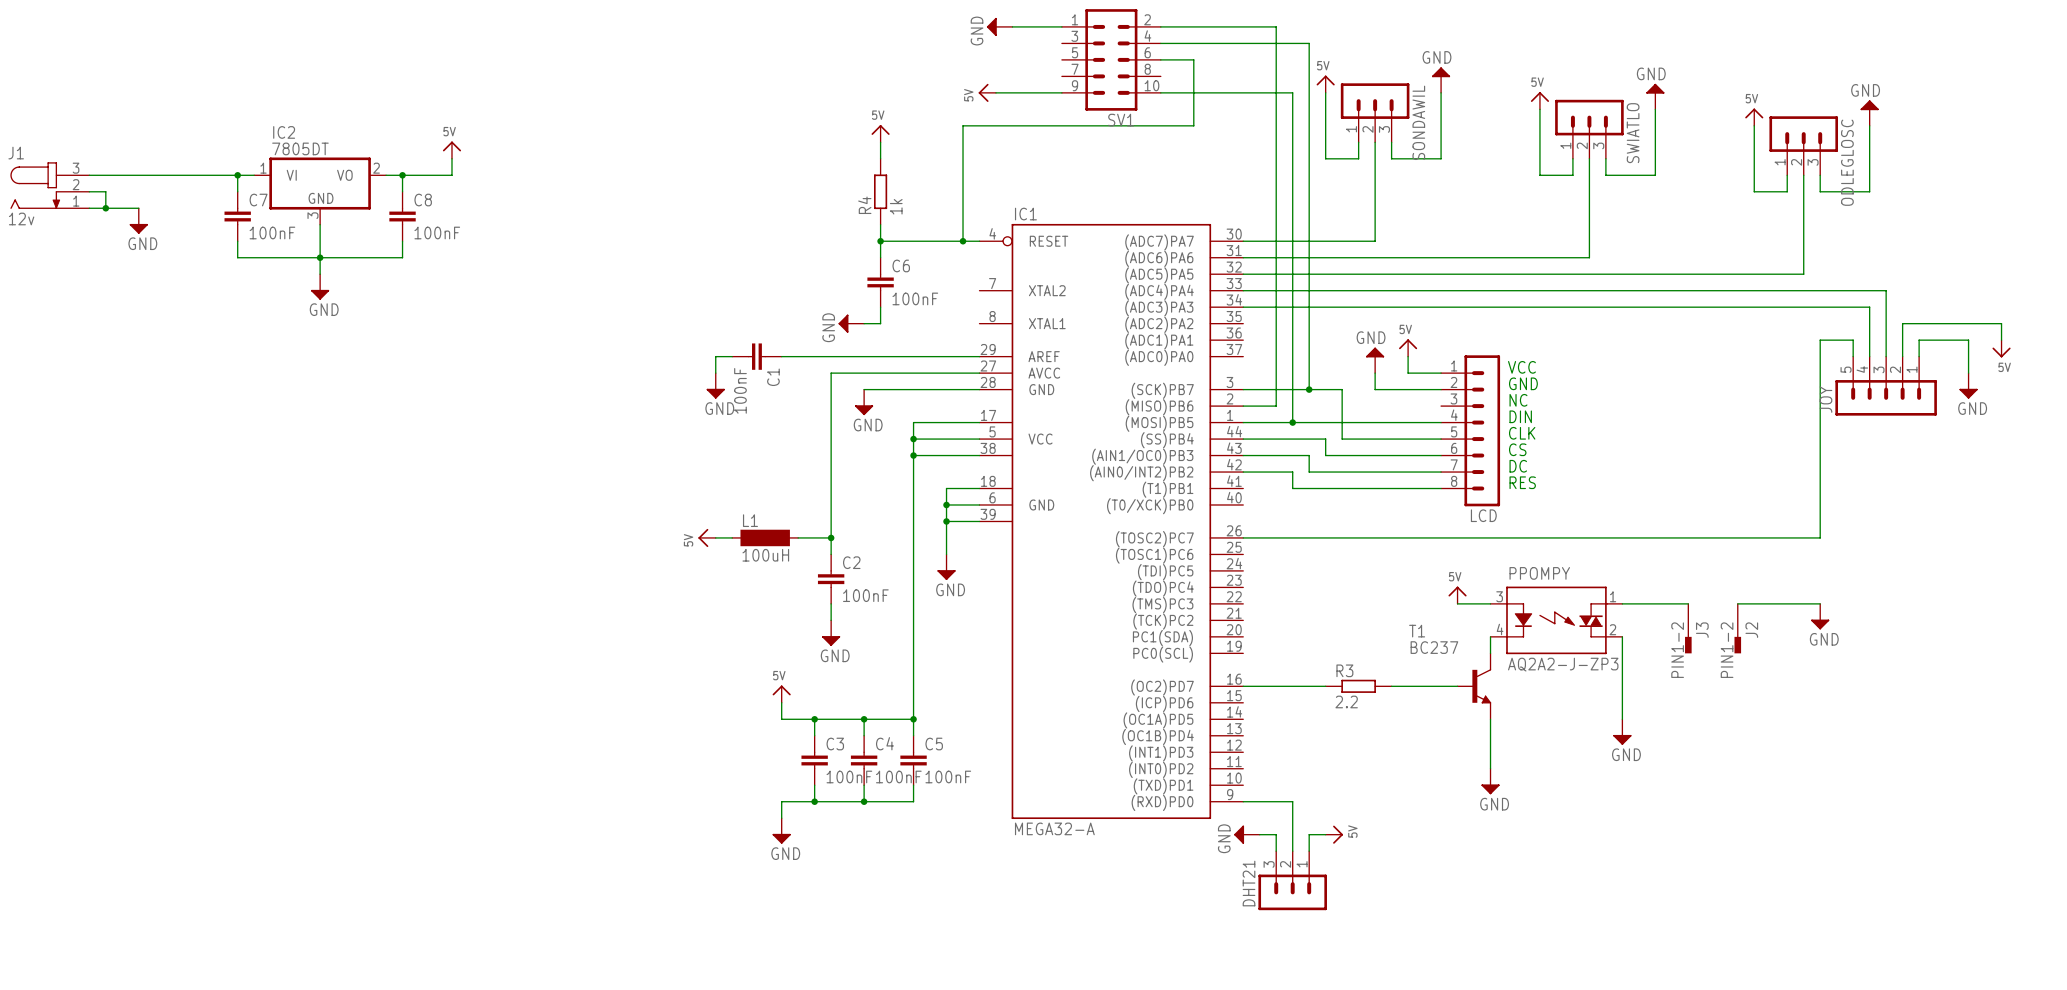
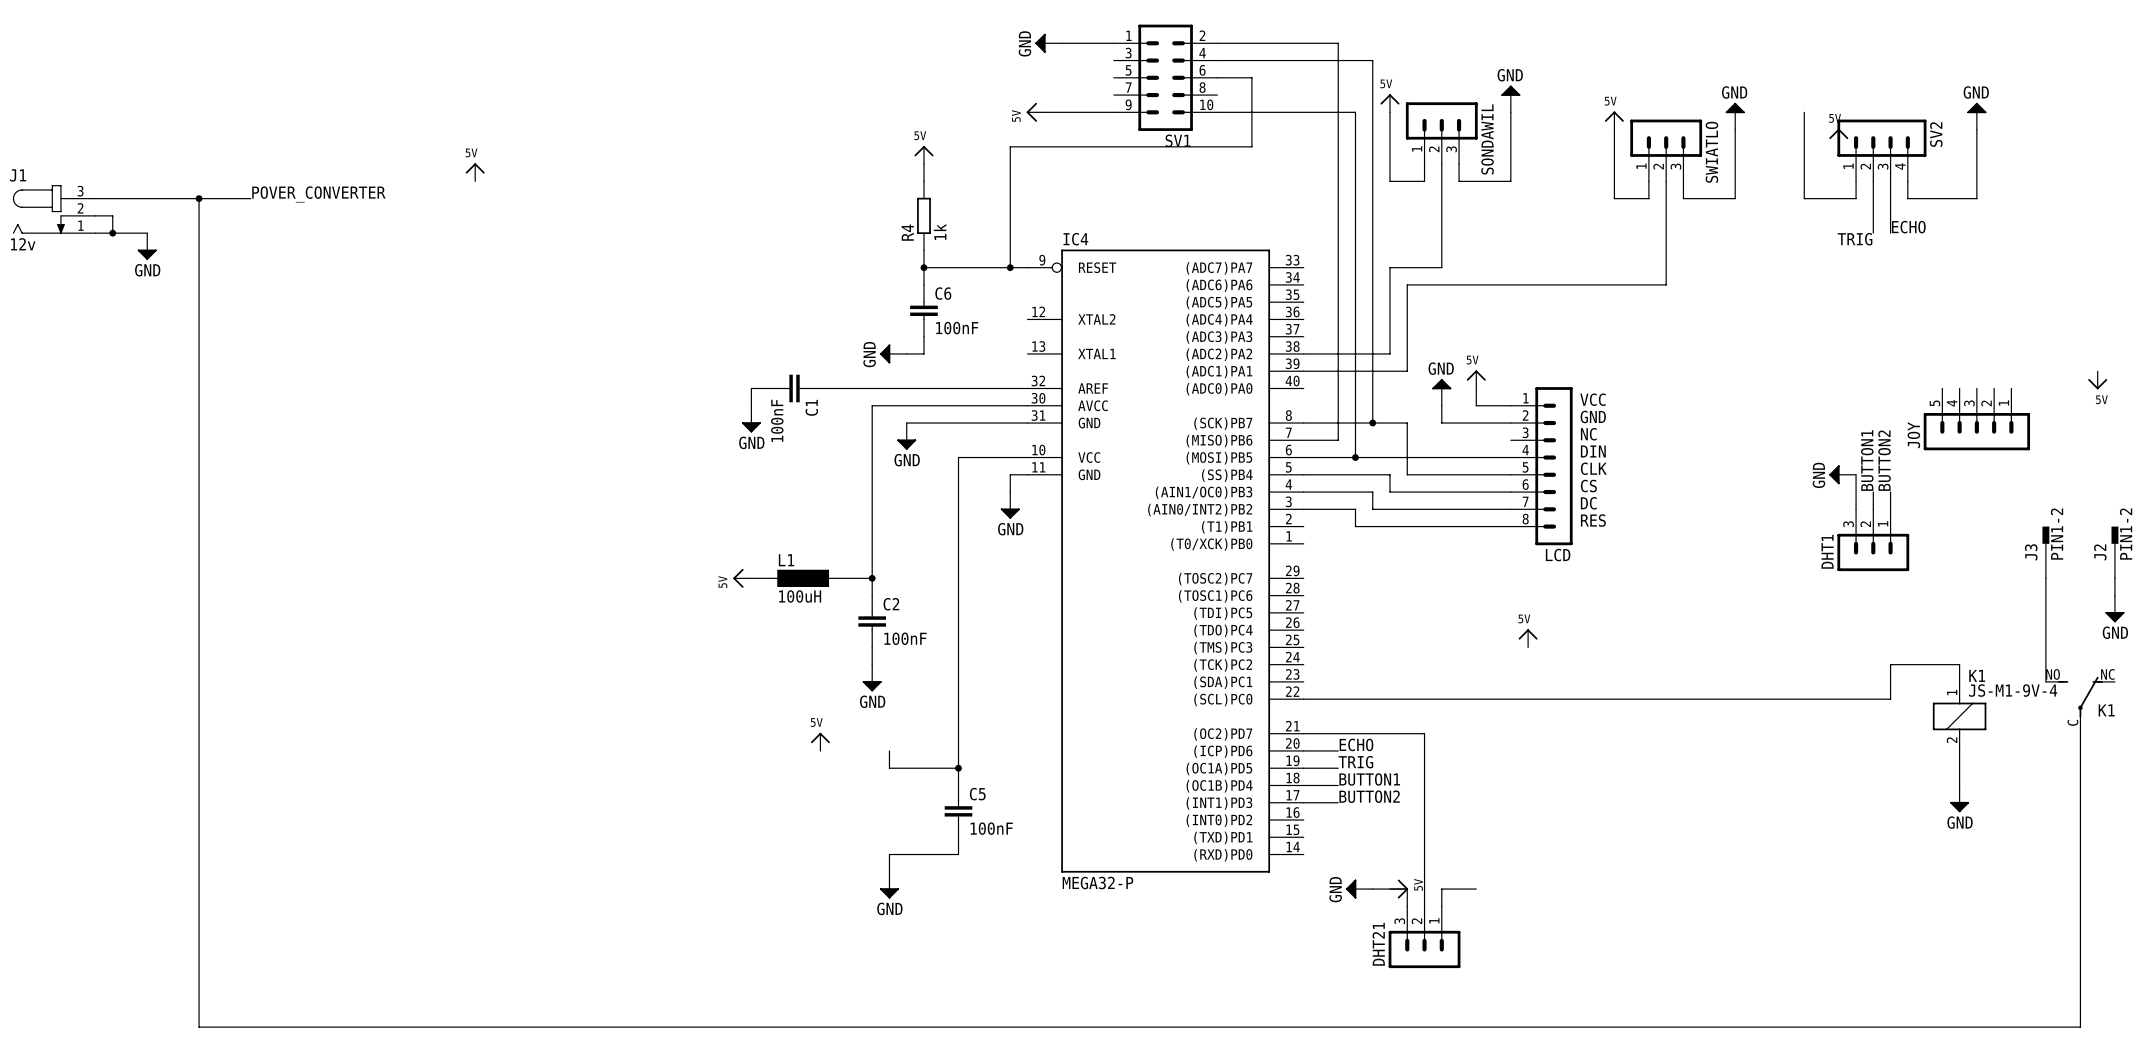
wire: none -> (1804, 112) (1804, 198) (1856, 198) (1856, 181)
wire: none -> (1976, 129) (1976, 198) (1907, 198) (1907, 181)
power symbol position: GND (1869, 113) -> GND (1976, 116)
wire: (1754, 125) (1754, 191) (1787, 191) -> (1873, 233) (1873, 215)
wire: (1869, 125) (1869, 191) (1820, 191) (1820, 175) -> none
SV2: none -> (1881, 150)
ODLEGLOSC: (1803, 145) -> none
wire: (451, 158) (451, 175) (386, 175) -> none
label: none -> POVER_CONVERTER (318, 194)
wire: none -> (199, 198) (199, 1027) (2080, 1027) (2080, 733)
junction: none -> (199, 198)
junction: (237, 175) -> none
wire: (254, 175) (237, 175) (237, 191) -> none
wire: (402, 175) (402, 191) -> none
junction: (402, 175) -> none
IC2: 7805DT (320, 191) -> none
label: none -> ECHO (1908, 227)
wire: (1803, 208) (1803, 274) (1243, 274) -> none
label: none -> TRIG (1855, 239)
C7: 100nF (237, 216) -> none
C8: 100nF (402, 216) -> none
wire: (320, 224) (320, 274) -> none
wire: (237, 241) (237, 257) (402, 257) (402, 241) -> none
wire: (1243, 241) (1325, 241) -> (1303, 353) (1390, 353) (1390, 267)
junction: (320, 257) -> none
wire: (1243, 257) (1342, 257) -> (1303, 371) (1407, 371) (1407, 284)
power symbol: GND (320, 286) -> none
wire: (1243, 290) (1886, 290) (1886, 356) -> none
wire: (1243, 307) (1869, 307) (1869, 356) -> none
wire: (2001, 340) (2001, 323) (1902, 323) (1902, 356) -> none
wire: (1853, 356) (1853, 340) (1820, 340) (1820, 537) (1243, 537) -> none
wire: (1919, 356) (1919, 340) (1968, 340) (1968, 373) -> none
power symbol: GND (1968, 385) -> none
label: none -> BUTTON1 (1867, 460)
label: none -> BUTTON2 (1884, 460)
wire: (913, 439) (963, 439) -> (1010, 492) (1010, 474)
junction: (913, 439) -> none
power symbol: none -> GND (1842, 474)
wire: none -> (1856, 474) (1856, 509)
wire: (913, 455) (979, 455) -> none
junction: (913, 455) -> none
wire: none -> (1873, 492) (1873, 509)
wire: none -> (1890, 492) (1890, 509)
wire: (979, 488) (946, 488) (946, 554) -> none
DHT1: none -> (1873, 540)
wire: (946, 504) (979, 504) -> none
junction: (946, 504) -> none
wire: (946, 521) (979, 521) -> none
junction: (946, 521) -> none
IC1: MEGA32-A (1111, 521) -> none
IC4: none -> MEGA32-P (1165, 561)
wire: none -> (2045, 578) (2045, 681)
wire: none -> (2114, 578) (2114, 595)
power symbol position: GND (946, 567) -> GND (1010, 505)
power symbol: none -> GND (2114, 608)
wire: (1457, 603) (1490, 603) -> none
wire: (1622, 603) (1688, 603) -> none
wire: (1737, 603) (1820, 603) -> none
power symbol: GND (1820, 616) -> none
PPOMPY: AQ2A2-J-ZP3 (1556, 620) -> none
J3 position: (1688, 628) -> (2045, 552)
J2 position: (1737, 628) -> (2114, 552)
wire: (1490, 636) (1490, 653) -> none
wire: (1622, 636) (1622, 719) -> none
wire: none -> (1959, 681) (1959, 664) (1890, 664) (1890, 699) (1303, 699)
J3 rotation: 0° (1688, 645) -> 180° (2045, 535)
J2 rotation: 0° (1737, 645) -> 180° (2114, 535)
K1: none -> (2080, 705)
K1: none -> JS-M1-9V-4 (1959, 716)
wire: none -> (1390, 733) (1424, 733) (1424, 906)
R3: 2.2 (1358, 686) -> none
wire: (1391, 686) (1457, 686) -> none
T1: BC237 (1474, 686) -> none
label: none -> ECHO (1356, 744)
wire: (781, 702) (781, 719) (847, 719) -> (889, 750) (889, 768)
wire: none -> (1303, 750) (1338, 750)
wire: none -> (1959, 750) (1959, 785)
label: none -> TRIG (1355, 762)
wire: (814, 719) (814, 735) -> none
junction: (814, 719) -> none
wire: (864, 719) (864, 735) -> none
junction: (864, 719) -> none
wire: none -> (1303, 768) (1338, 768)
wire: (1490, 719) (1490, 768) -> none
label: none -> BUTTON1 (1369, 779)
power symbol: GND (1622, 732) -> none
wire: none -> (1303, 785) (1338, 785)
label: none -> BUTTON2 (1369, 796)
power symbol: none -> GND (1959, 798)
wire: none -> (1303, 802) (1338, 802)
C3: 100nF (814, 760) -> none
C4: 100nF (864, 760) -> none
power symbol: GND (1490, 781) -> none
wire: (814, 785) (814, 801) -> none
wire: (864, 785) (864, 801) -> none
junction: (814, 801) -> none
wire: (847, 801) (781, 801) (781, 818) -> (889, 854) (889, 871)
junction: (864, 801) -> none
wire: (1243, 801) (1292, 801) (1292, 851) -> none
power symbol position: GND (781, 830) -> GND (889, 885)
power symbol position: GND (1246, 834) -> GND (1359, 889)
wire: (1259, 834) (1276, 834) (1276, 851) -> (1390, 889) (1407, 889) (1407, 906)
wire: (1309, 834) (1309, 851) -> none
wire: none -> (1476, 889) (1441, 889) (1441, 906)
DHT21 position: (1292, 880) -> (1424, 937)

